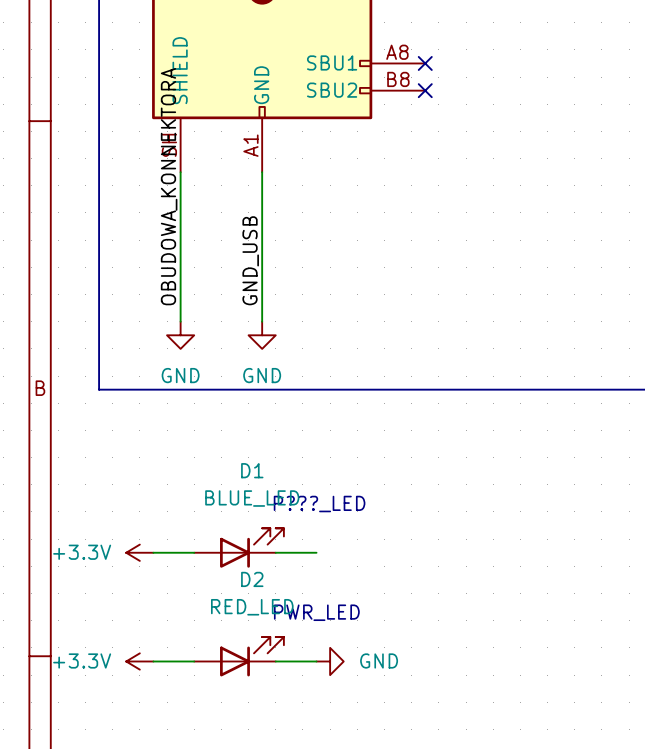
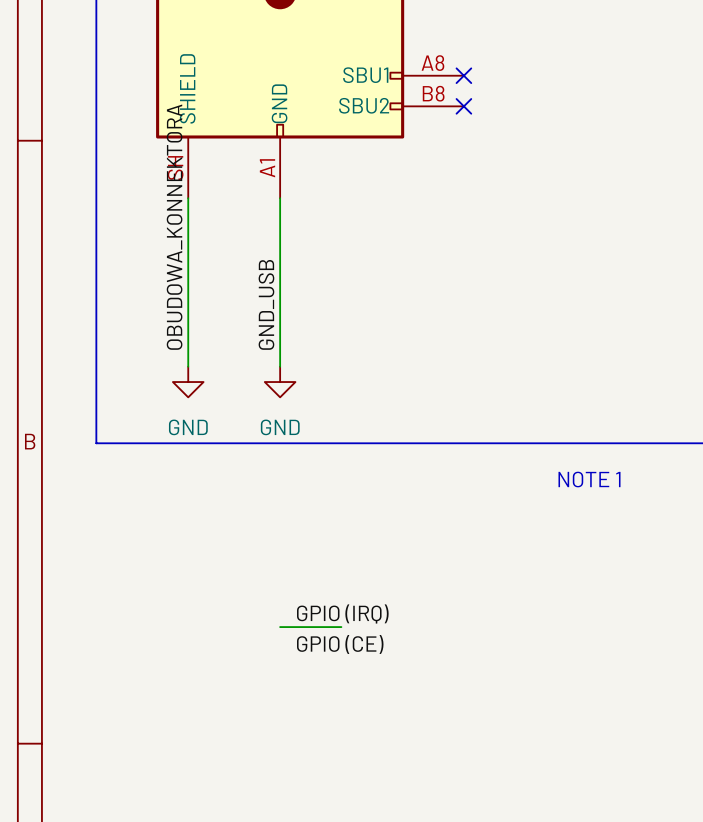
text: none -> NOTE 1 (589, 479)
text: P???_LED (319, 504) -> none
label: none -> GPIO (IRQ) (342, 613)
D1: BLUE_LED (239, 548) -> none
power symbol: +3.3V (139, 552) -> none
wire: (153, 552) (194, 552) -> none
label: none -> GPIO (CE) (340, 644)
text: PWR_LED (316, 612) -> none
D2: RED_LED (239, 656) -> none
power symbol: +3.3V (139, 661) -> none
wire: (153, 661) (194, 661) -> none
wire: (275, 661) (316, 661) -> none
power symbol: GND (330, 661) -> none

